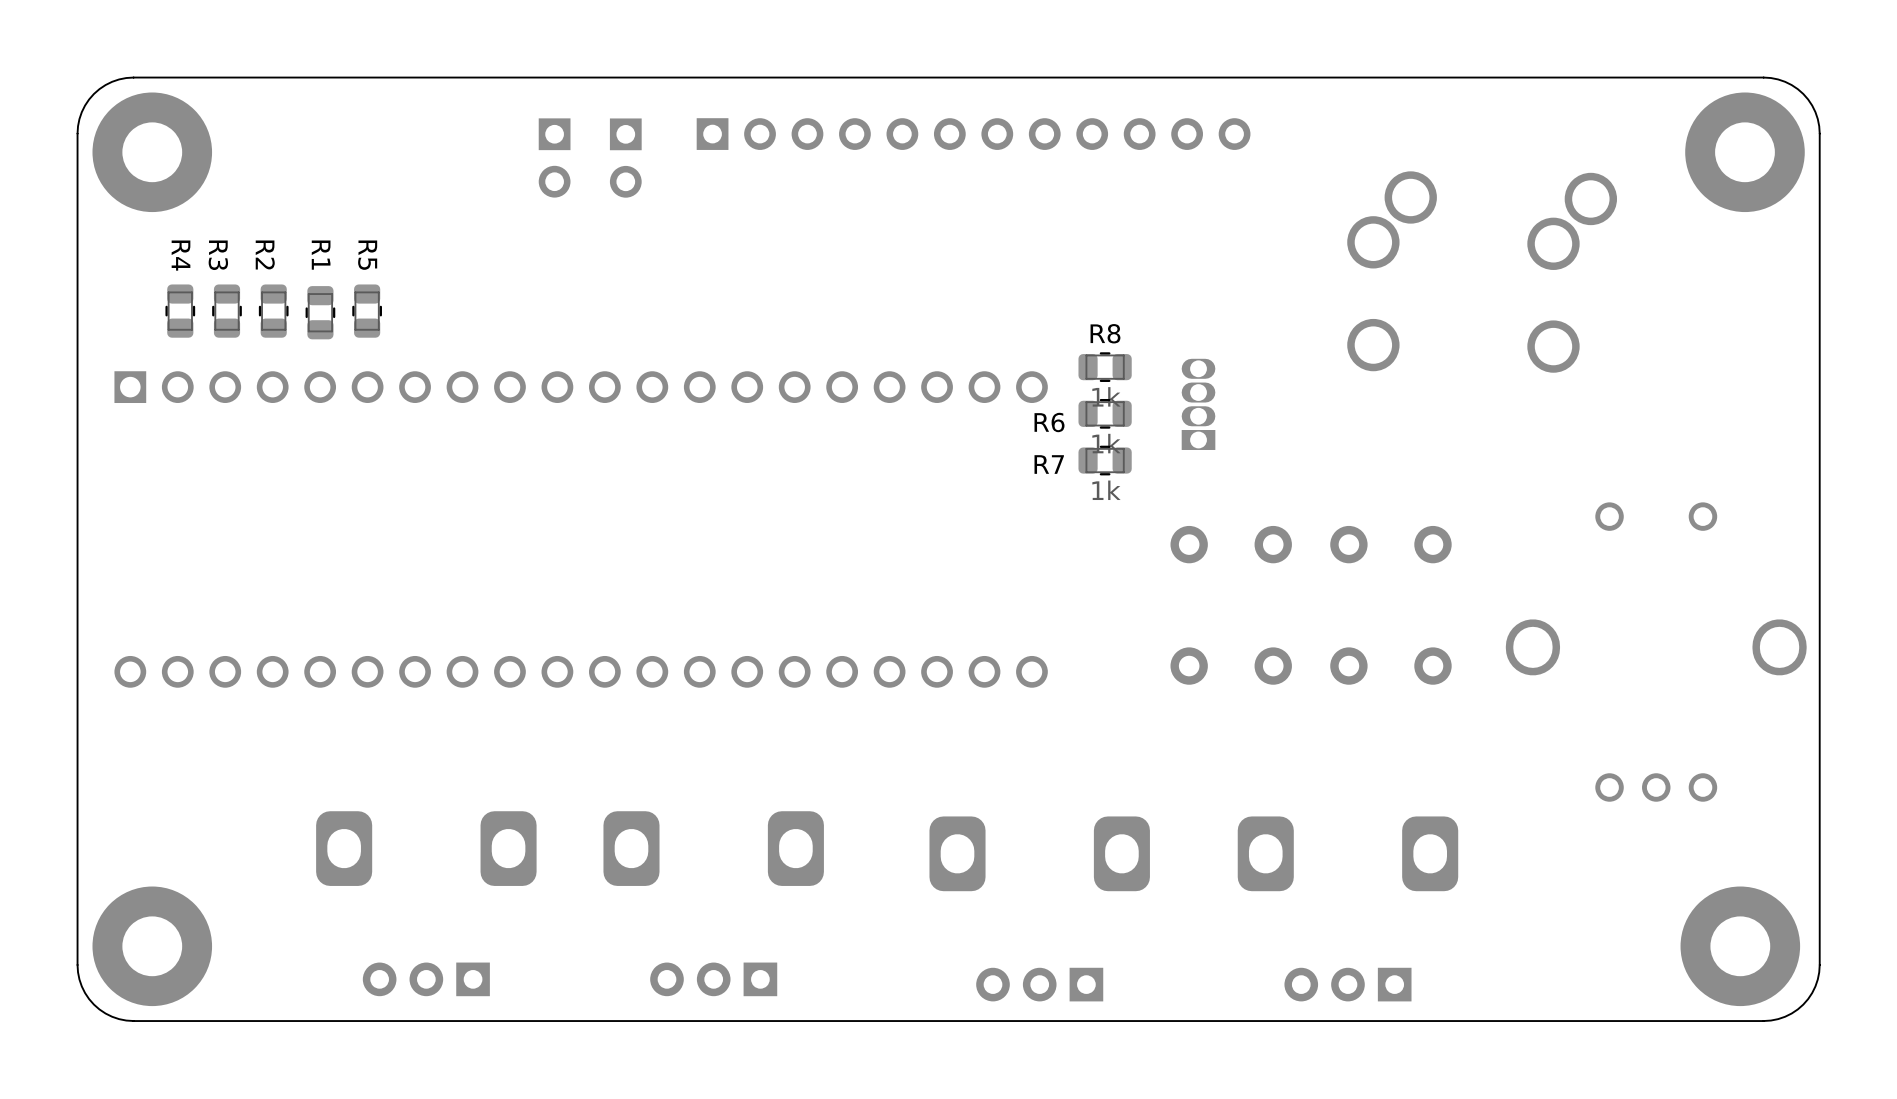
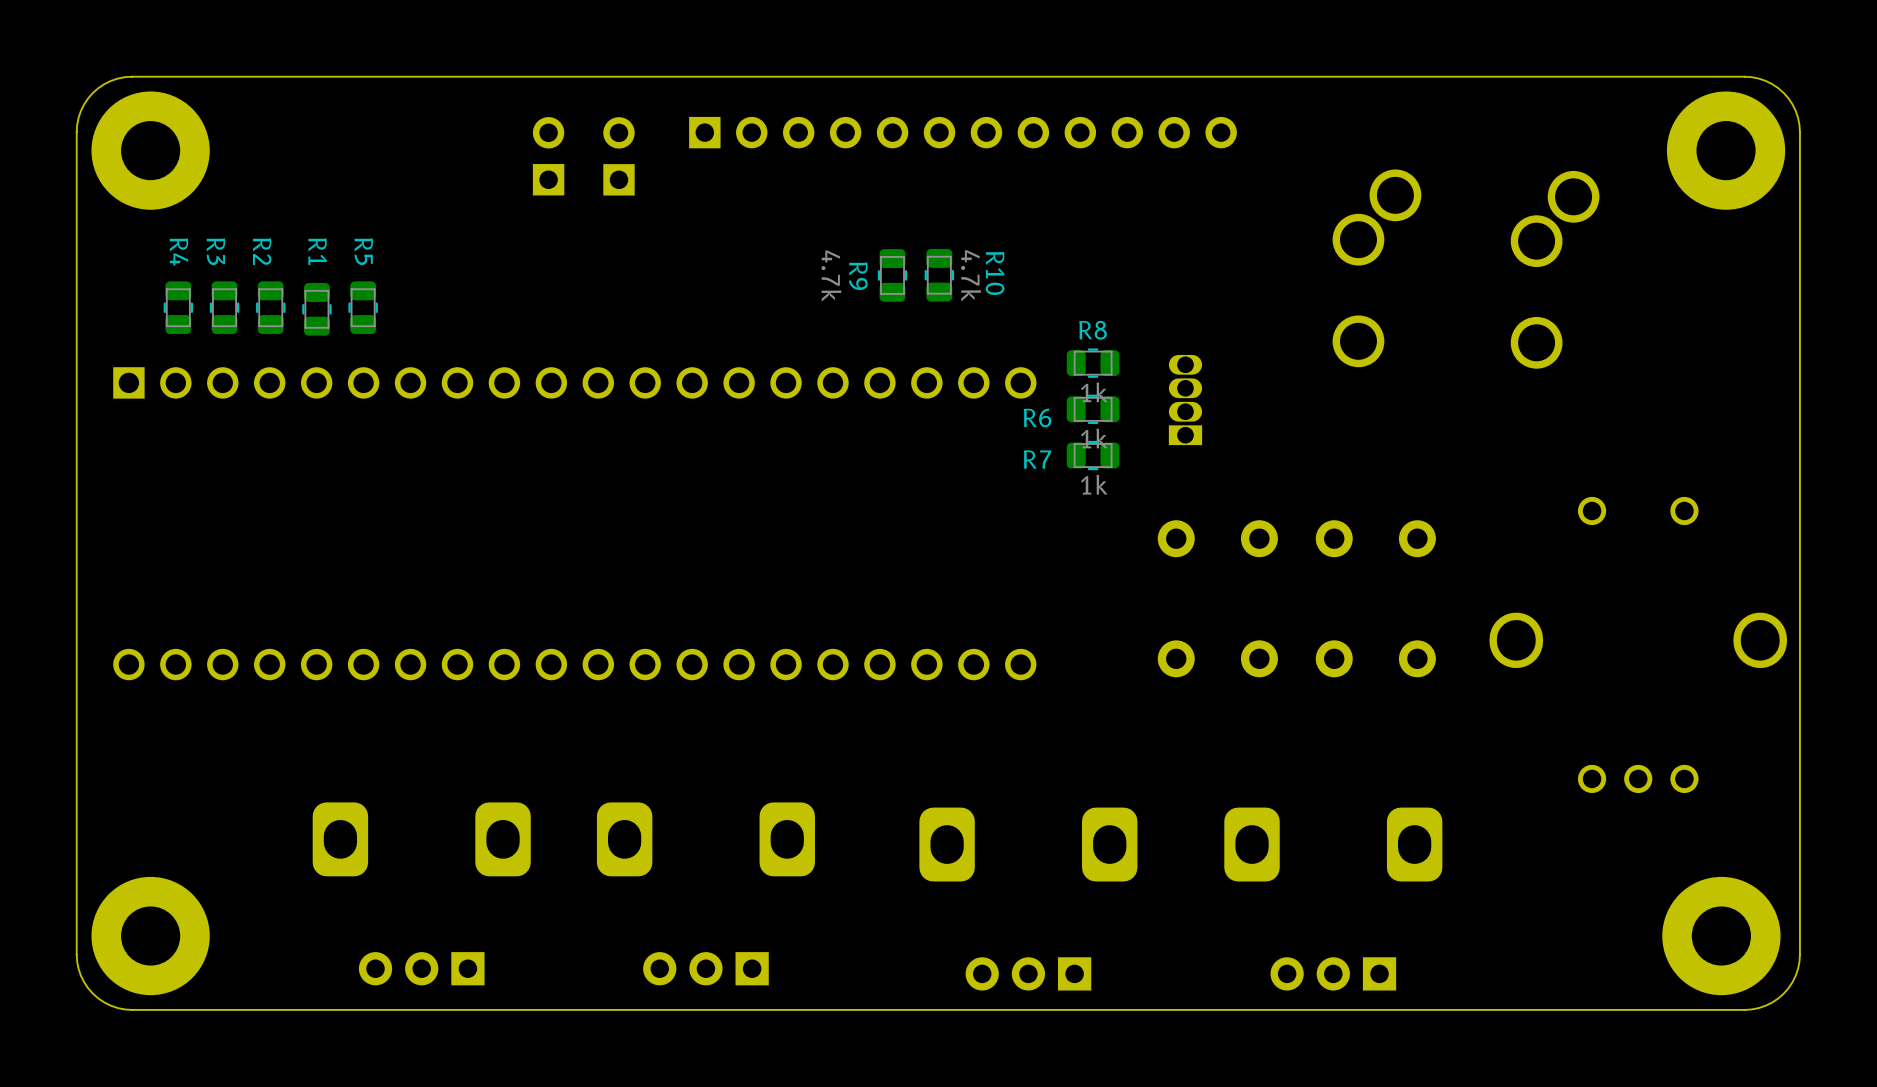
part rotation: 0° (554, 157) -> 180° (548, 156)
part rotation: 0° (625, 158) -> 180° (618, 156)
R9: none -> 4.7k (892, 275)
R10: none -> 4.7k (939, 275)

